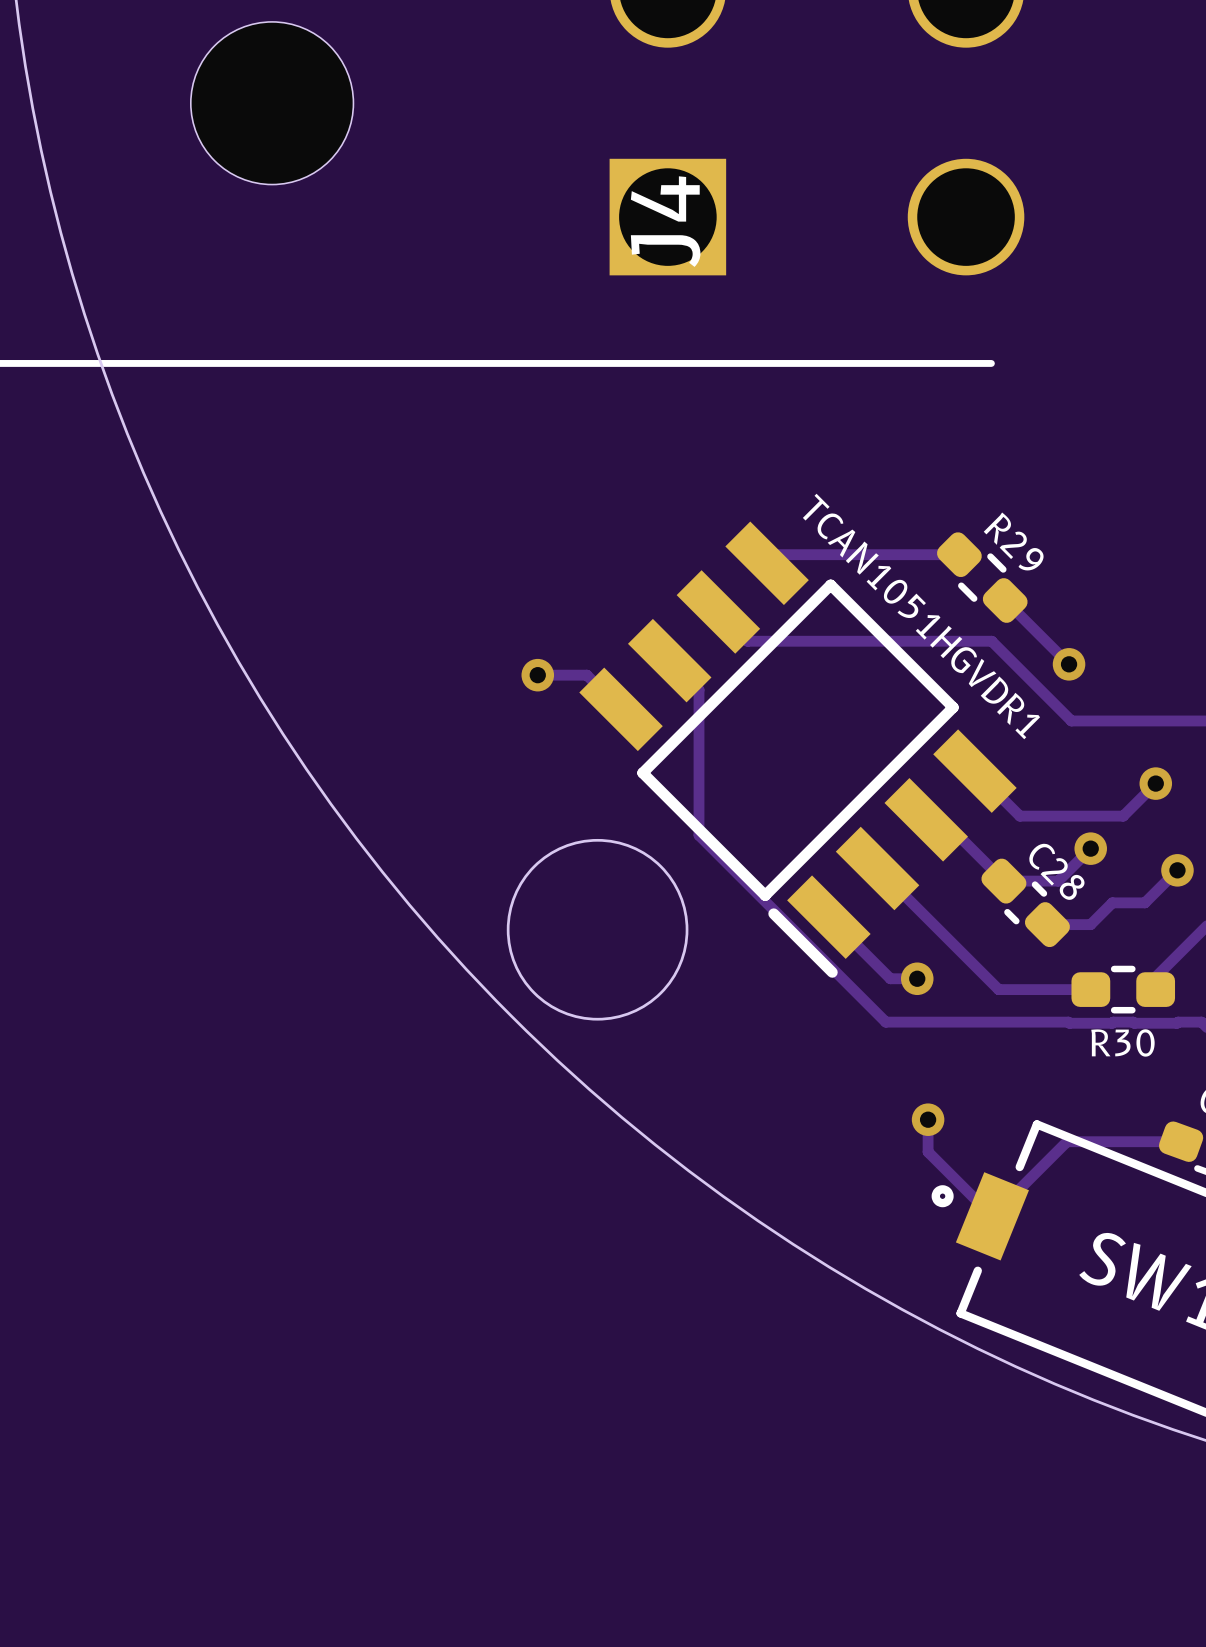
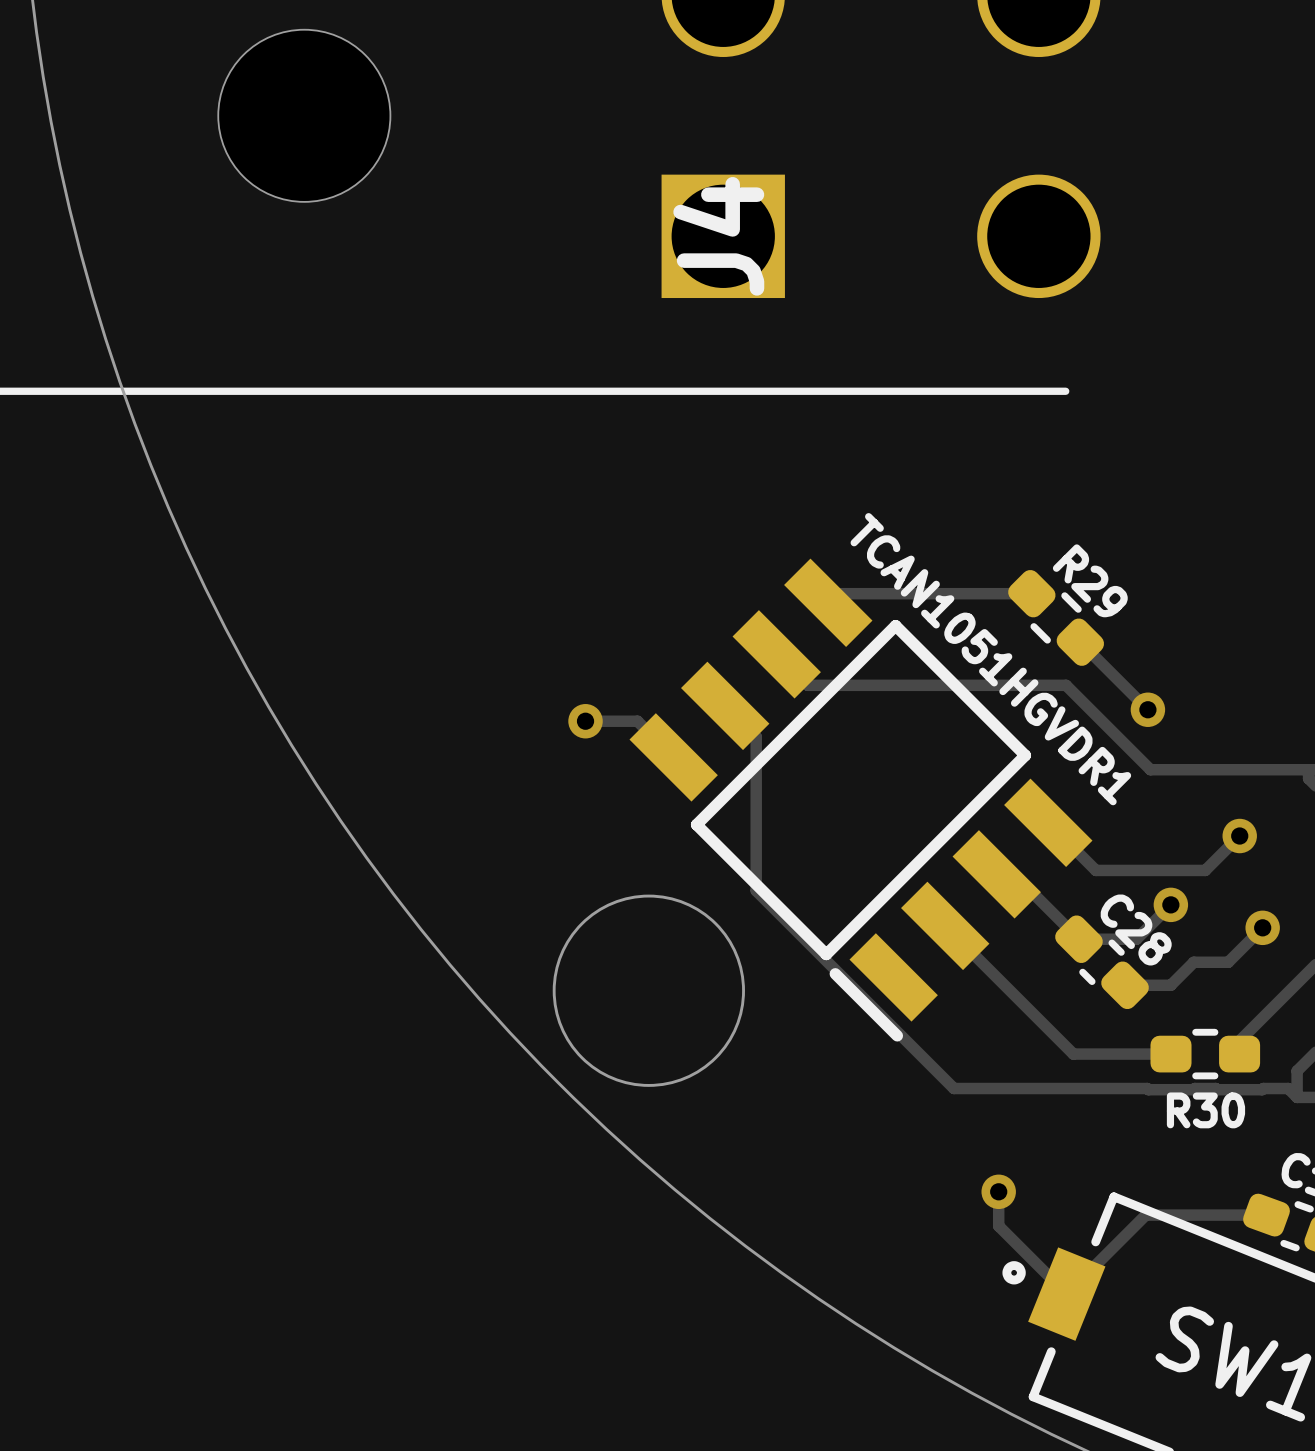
track: (828, 917) (890, 978) (917, 978) -> none
via: (917, 978) -> none

